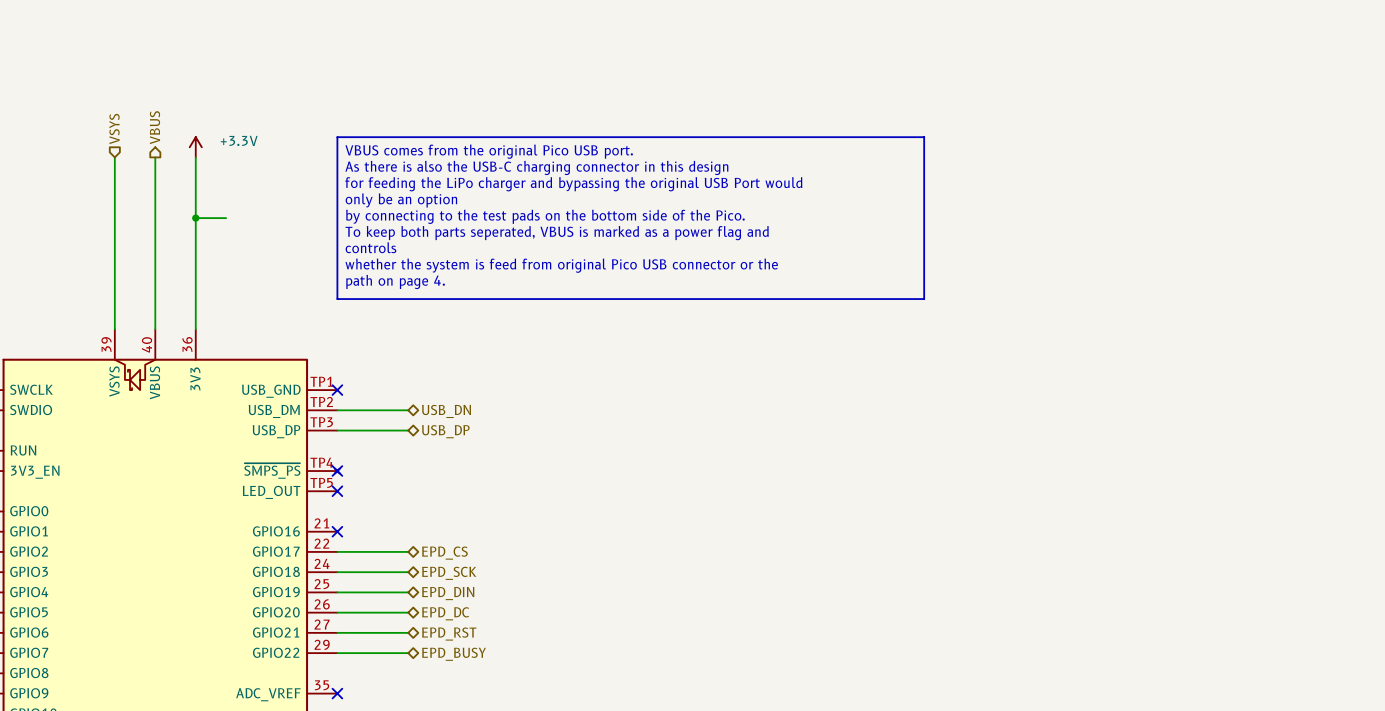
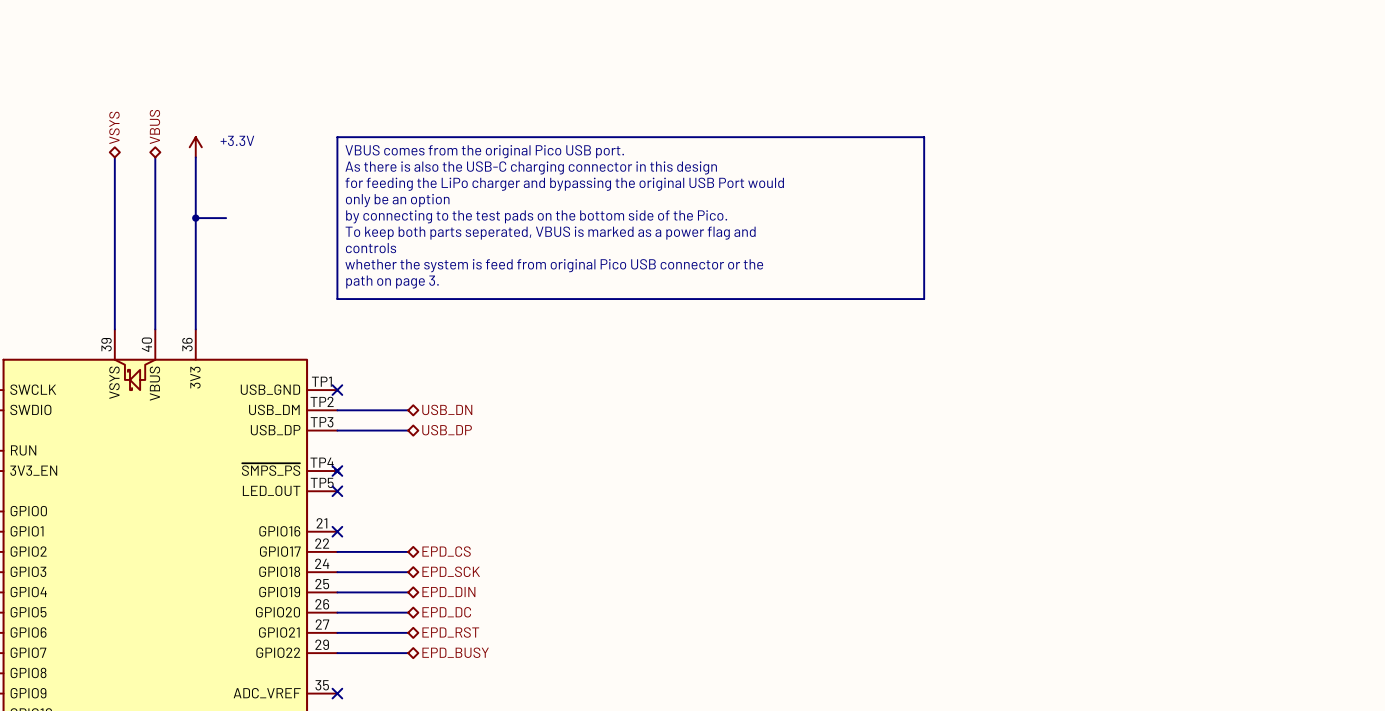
hierarchical label shape: output (154, 127) -> bidirectional (154, 127)
hierarchical label shape: input (114, 128) -> bidirectional (114, 127)
text: path on page 4. (395, 281) -> path on page 3. (392, 282)

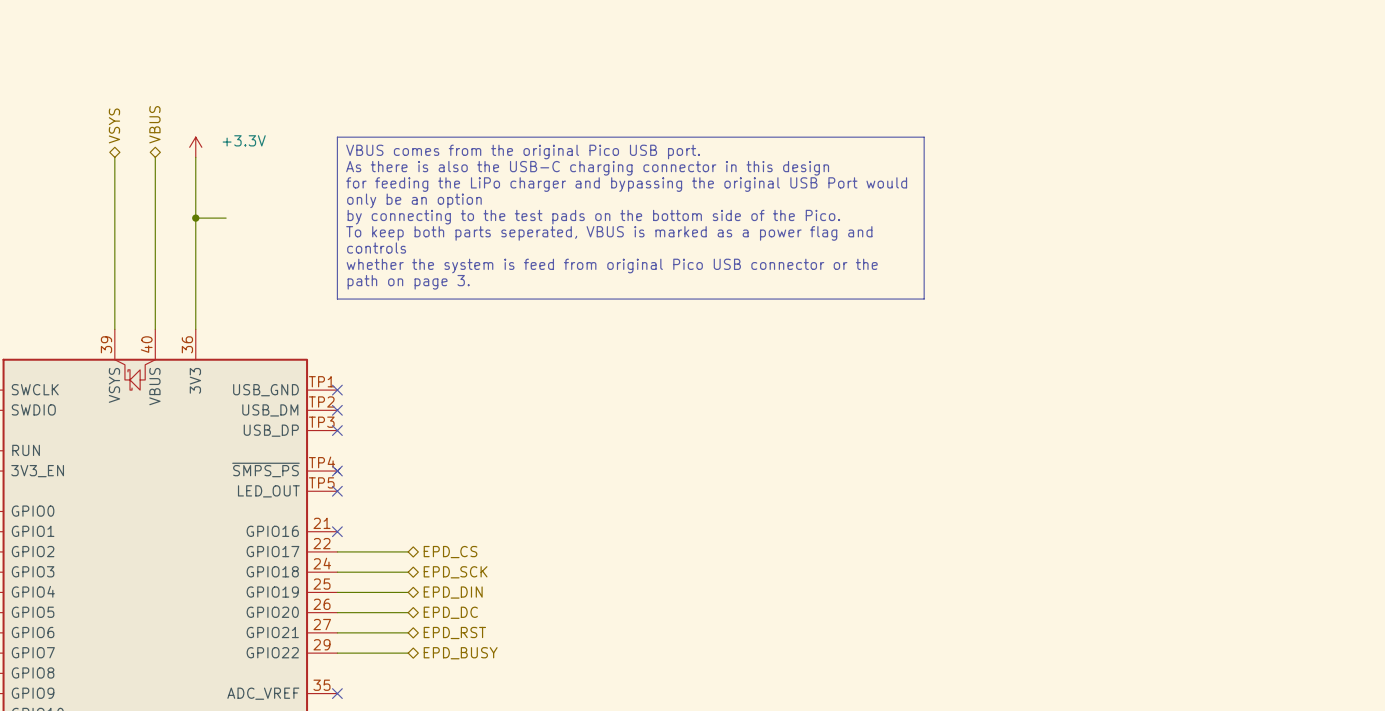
hierarchical label: USB_DN (447, 409) -> none
wire: (337, 410) (408, 410) -> none
no-connect mark: none -> (337, 410)
wire: (337, 430) (408, 430) -> none
no-connect mark: none -> (337, 430)
hierarchical label: USB_DP (447, 430) -> none

